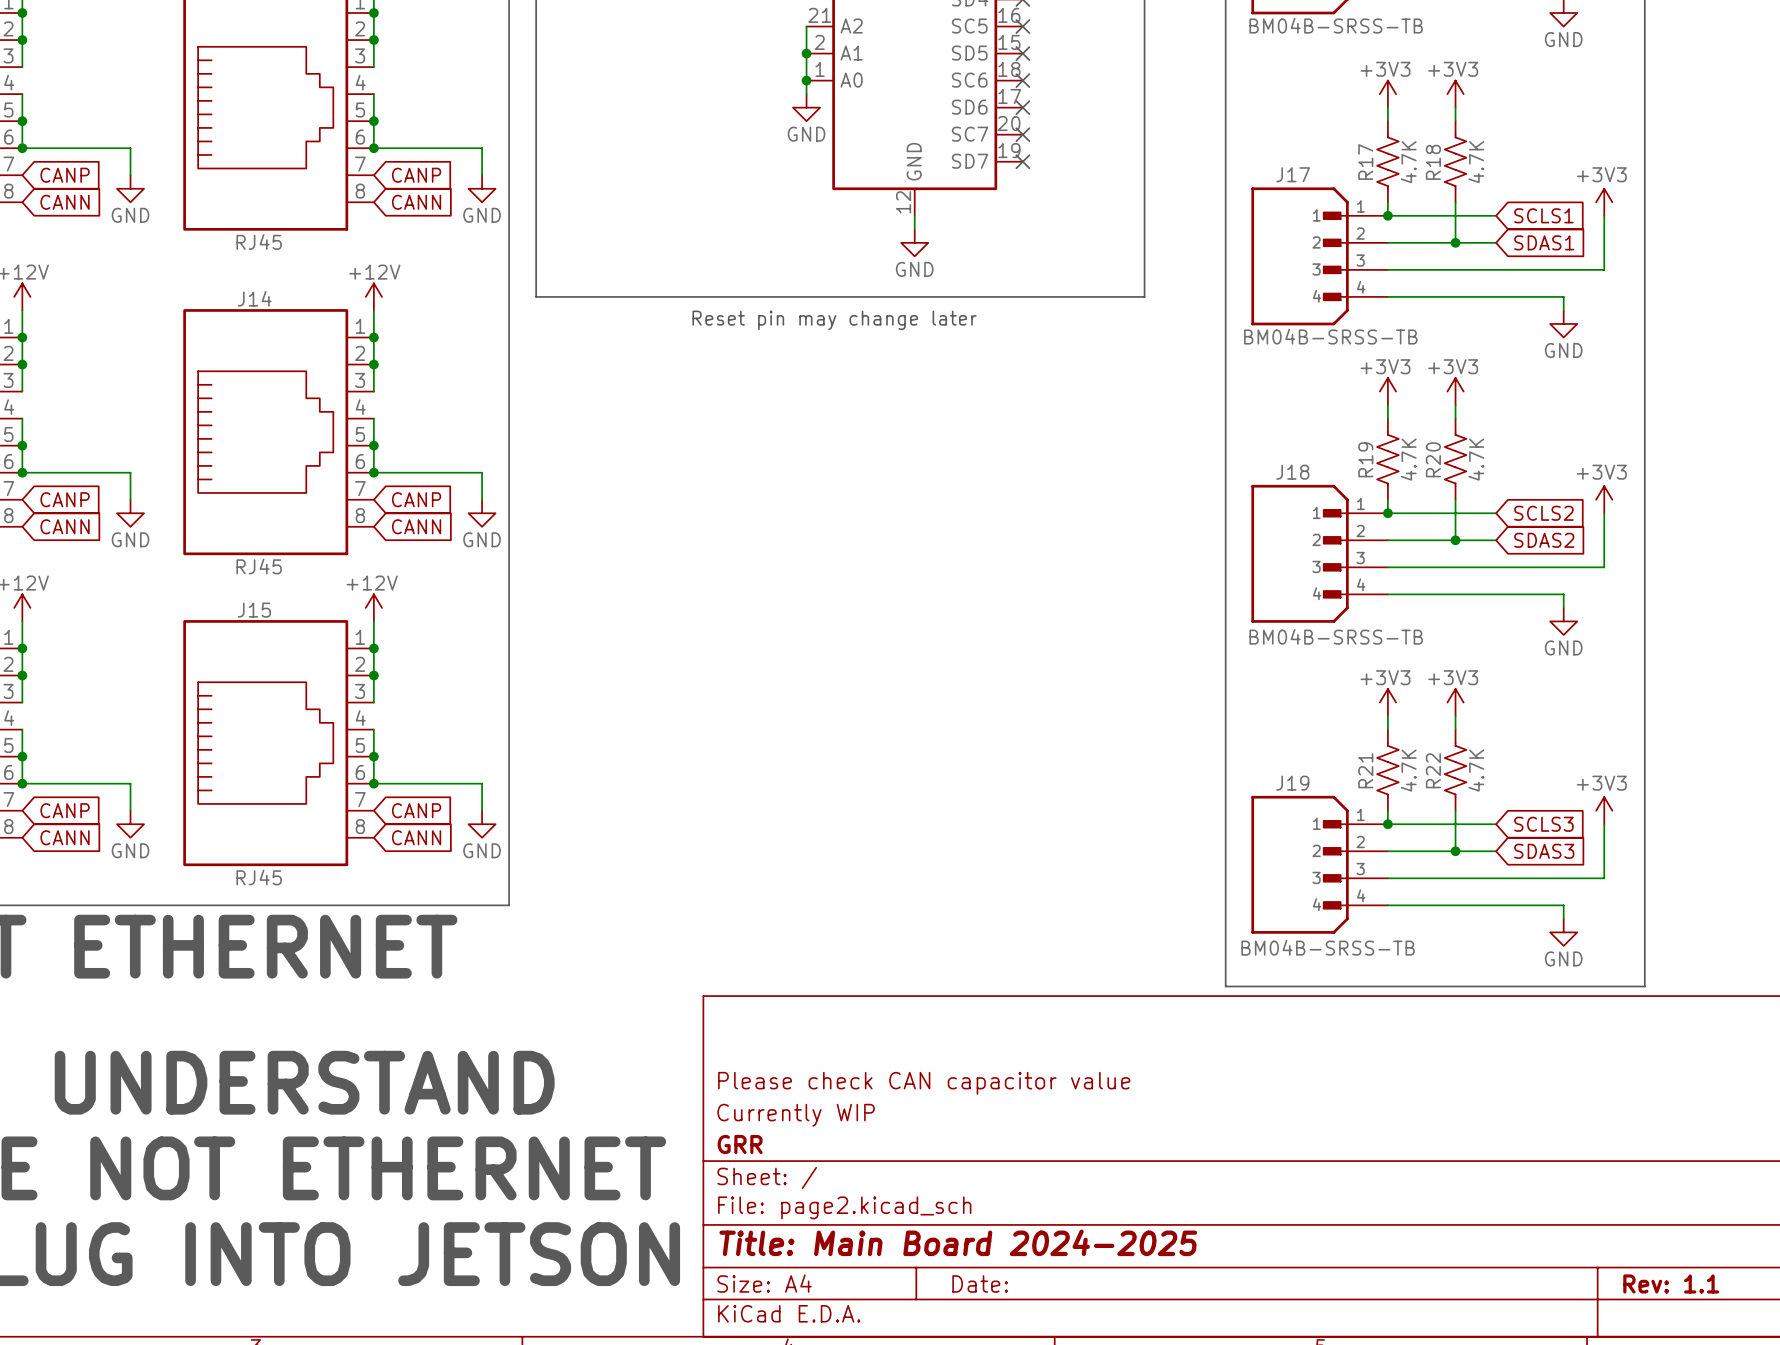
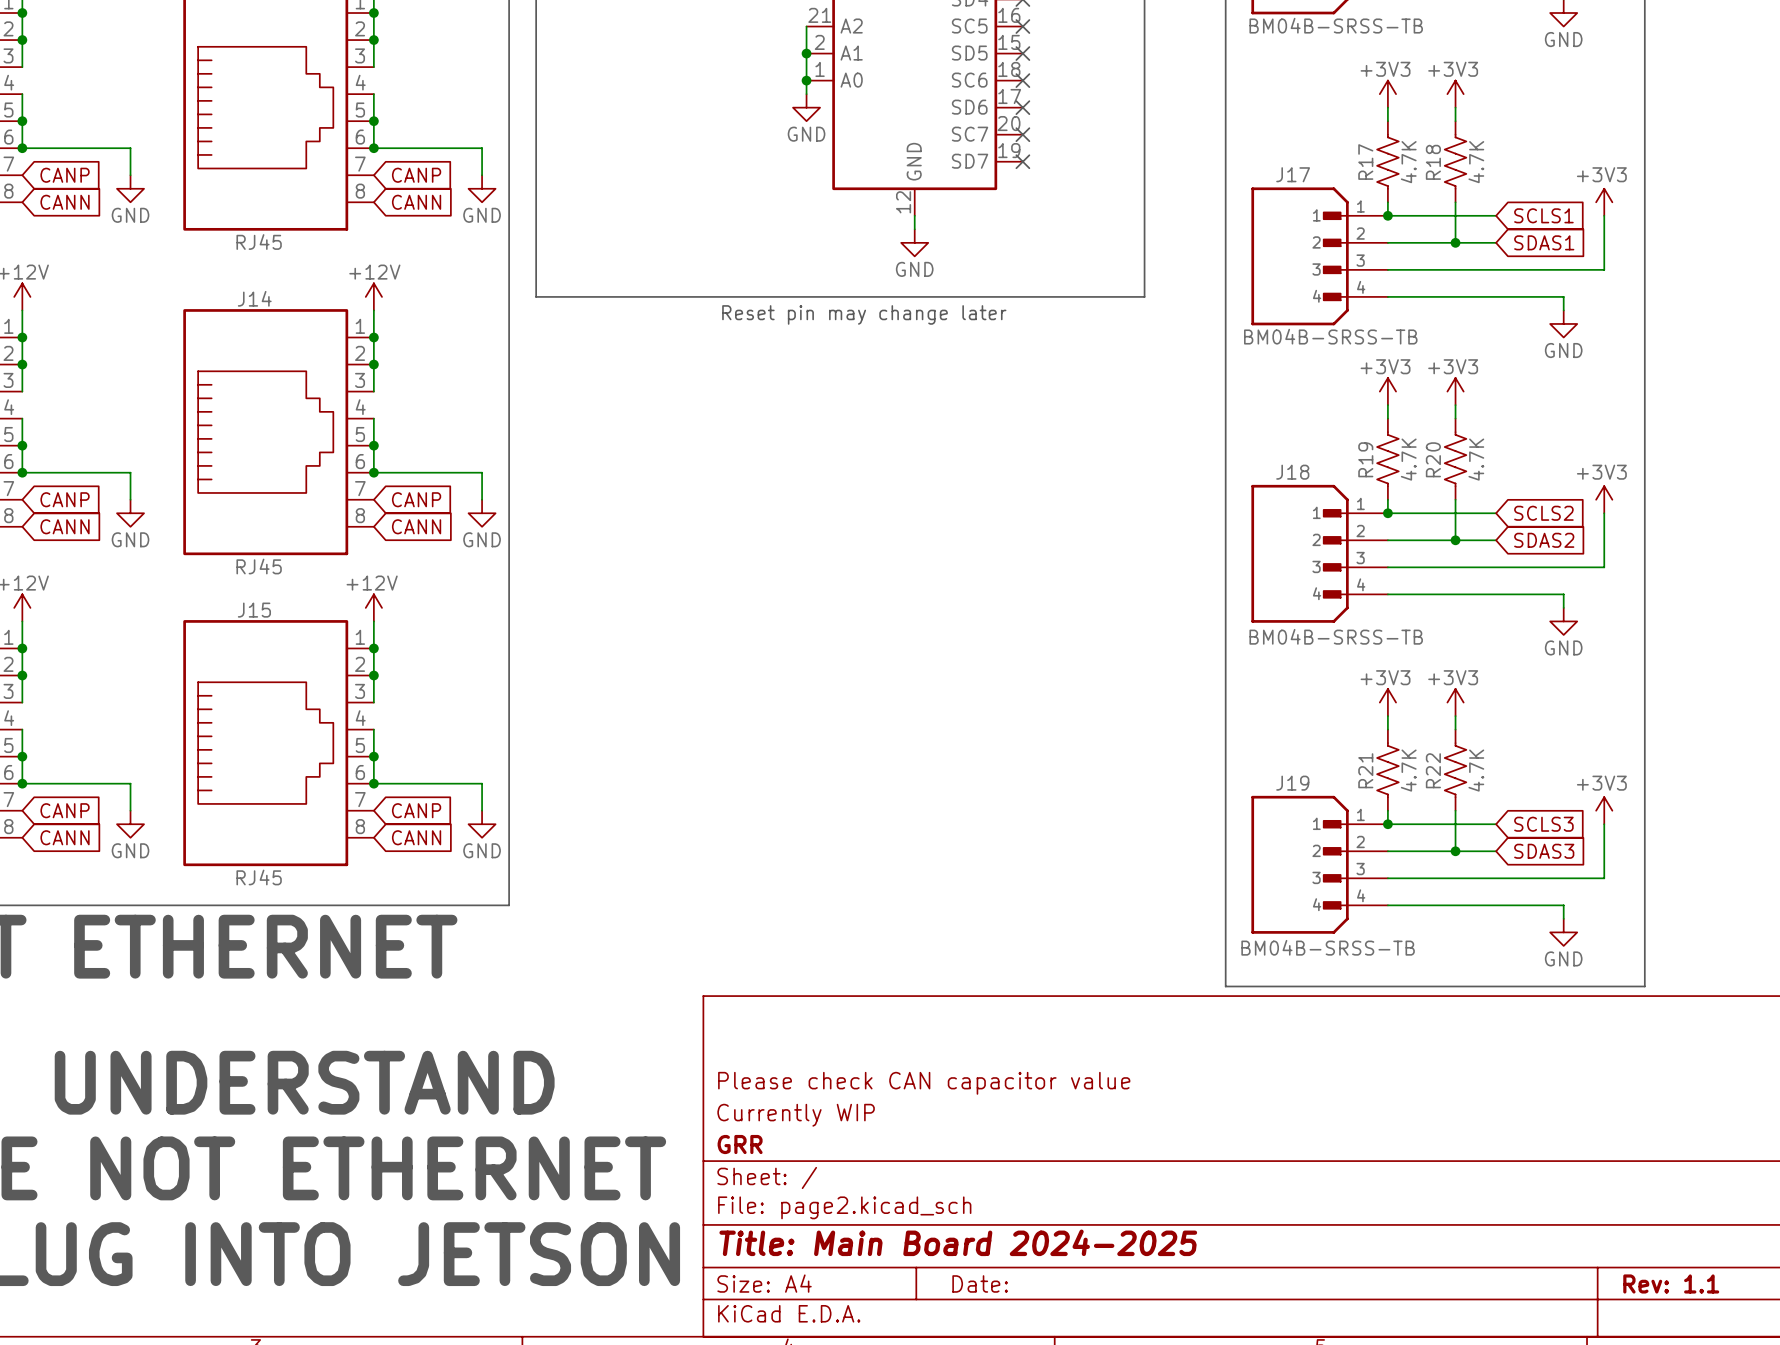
text position: Reset pin may change later (834, 320) -> Reset pin may change later (864, 314)

